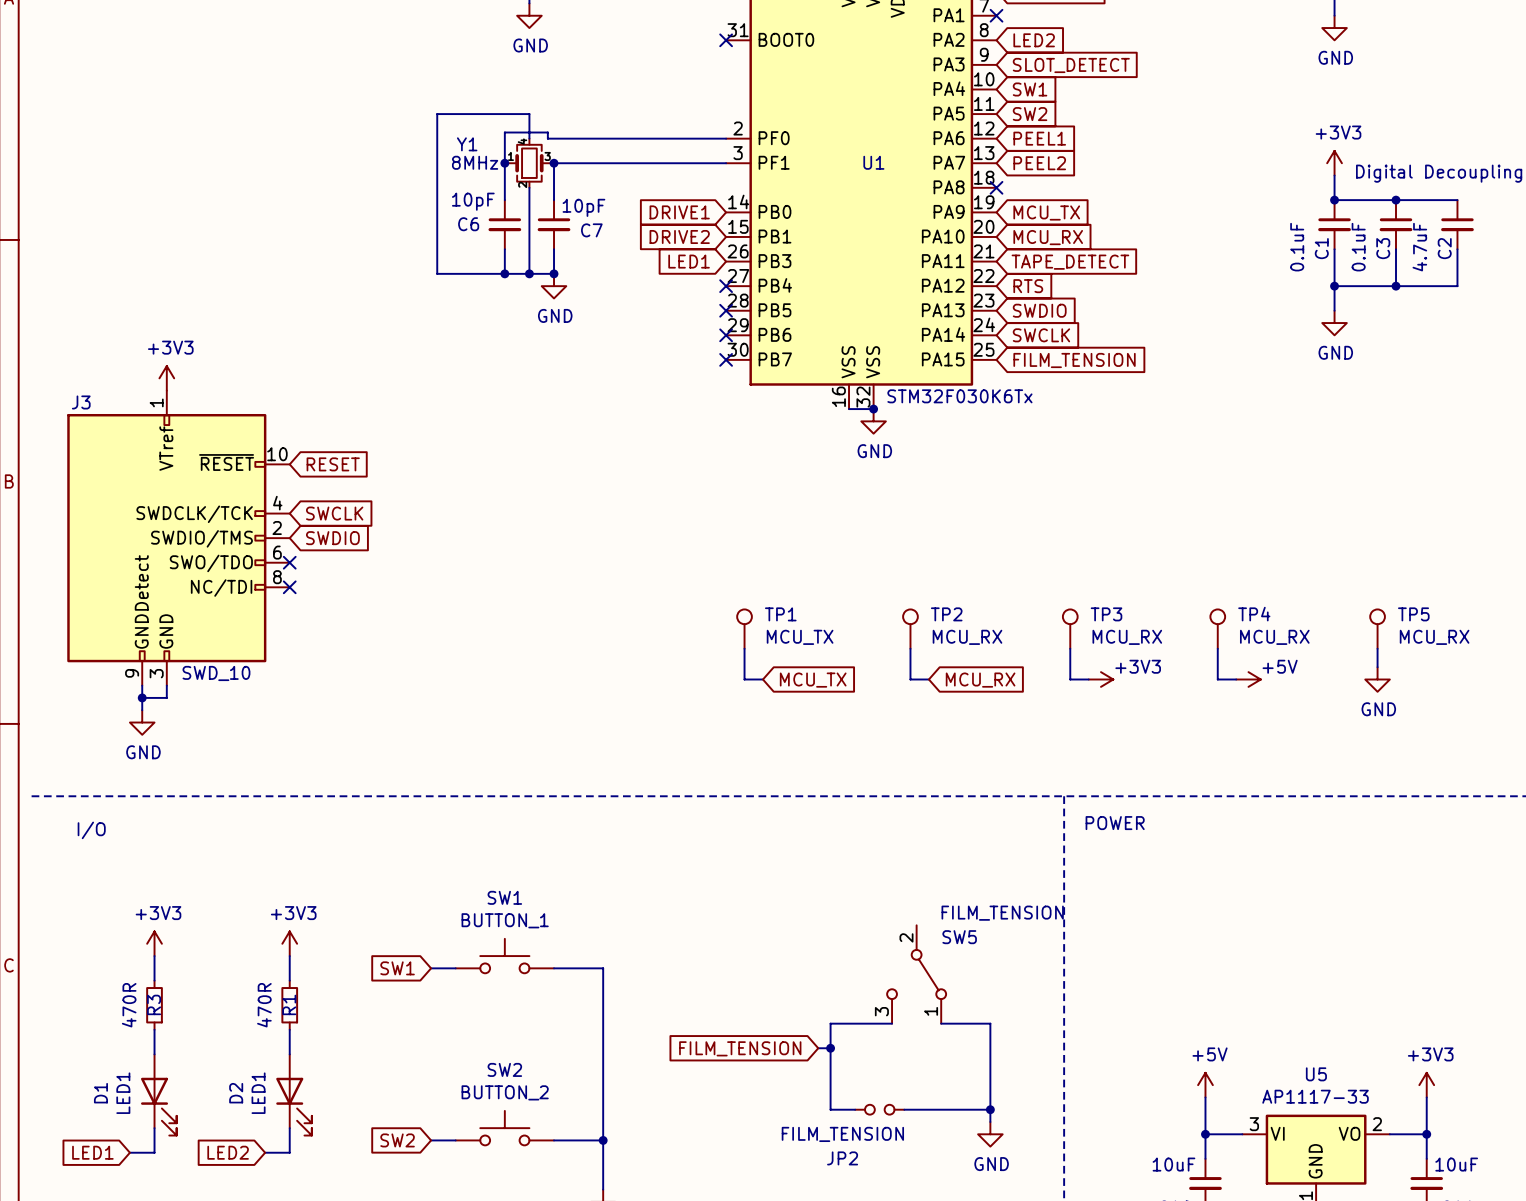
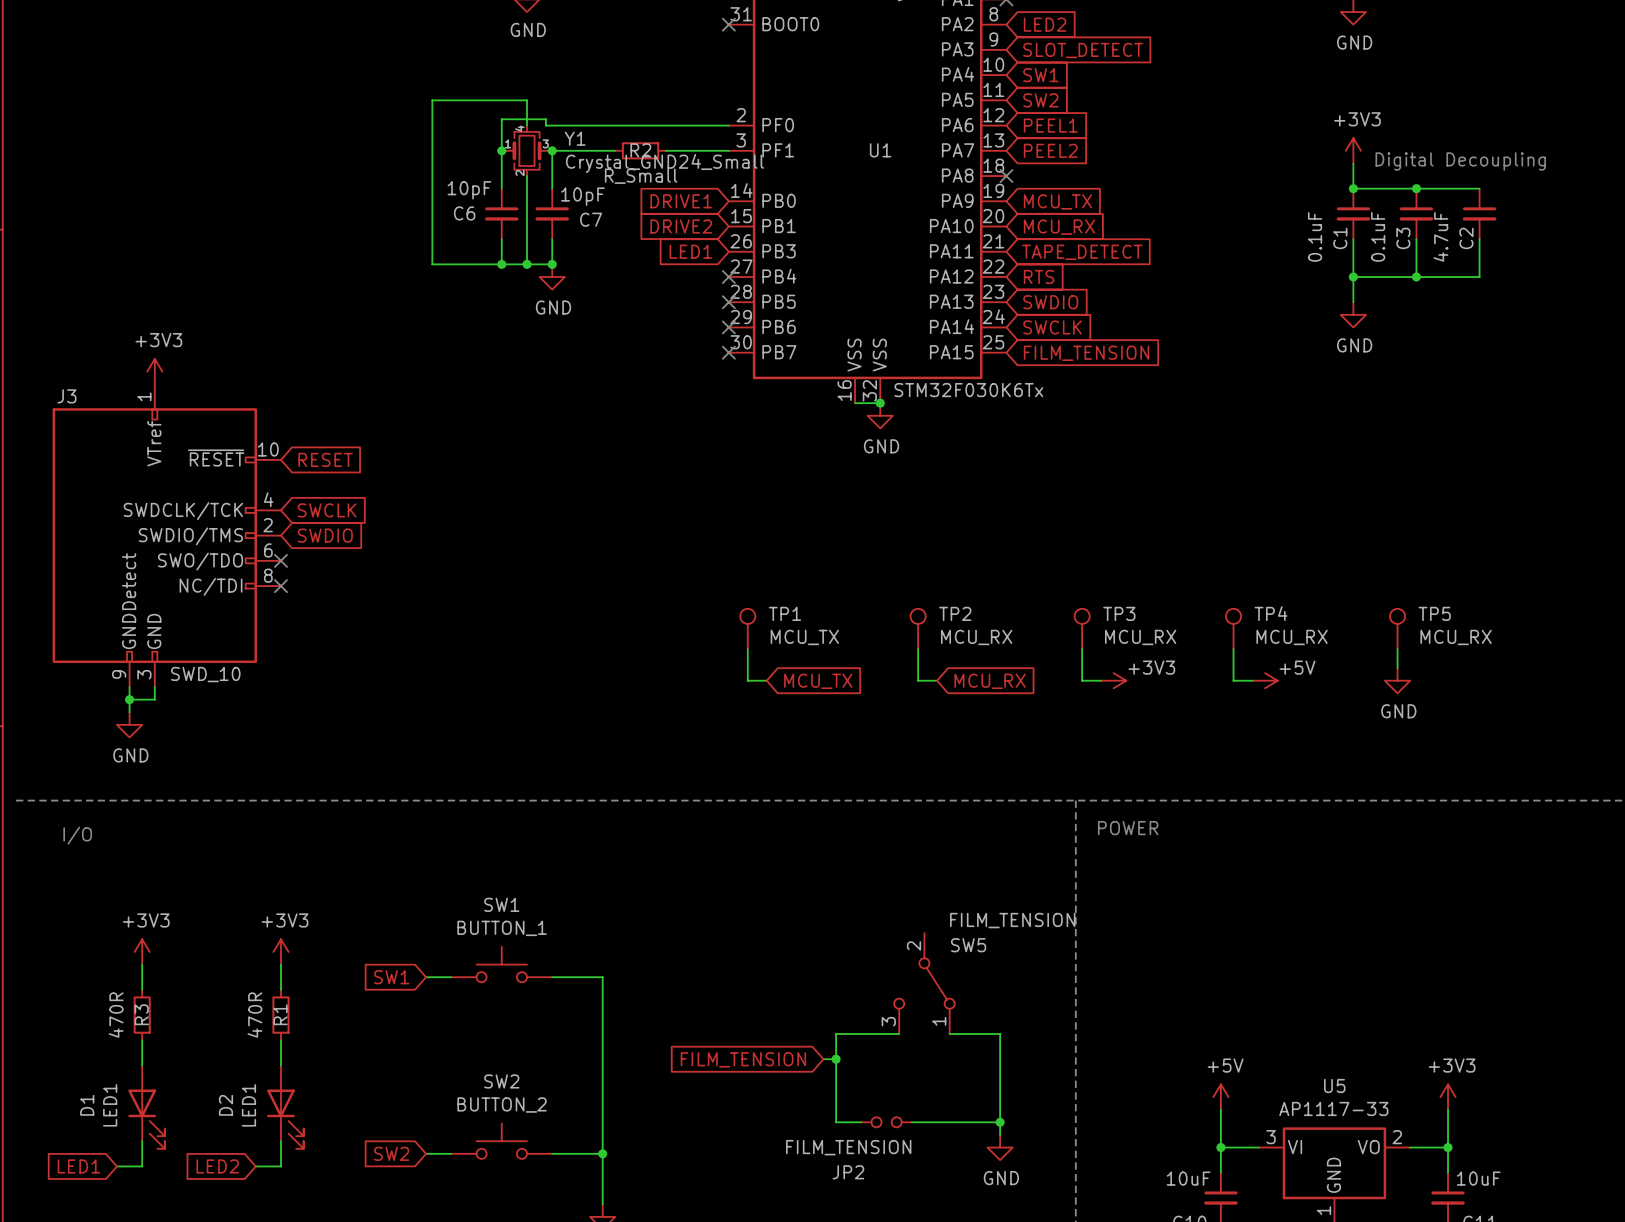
Y1 name position: Y1 (467, 144) -> Y1 (575, 138)
Y1 value: 8MHz (475, 162) -> Crystal_GND24_Small (664, 163)
R2: none -> R_Small (640, 150)

